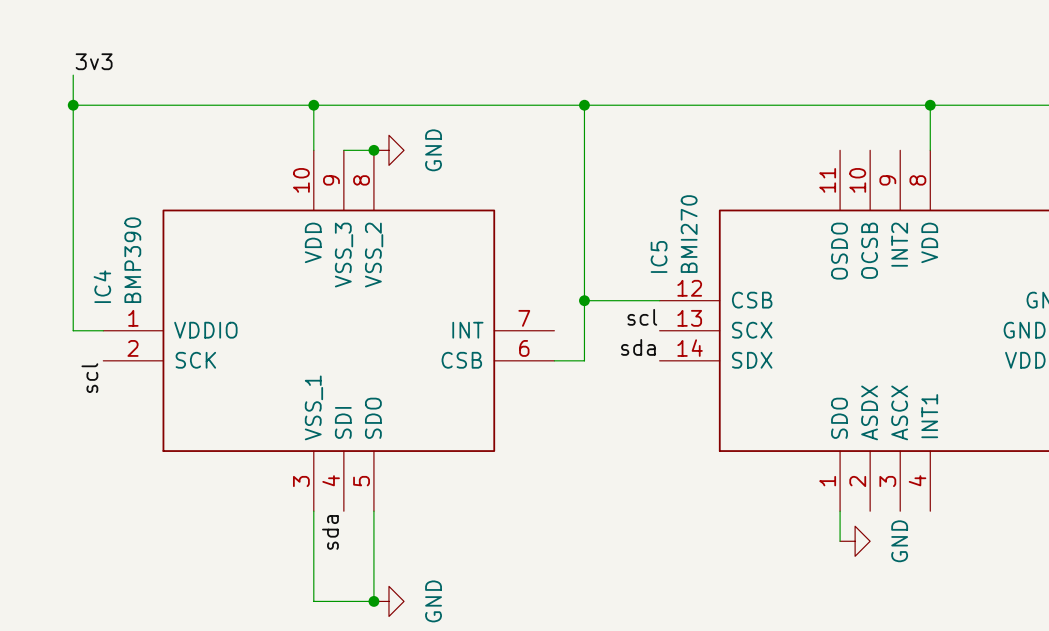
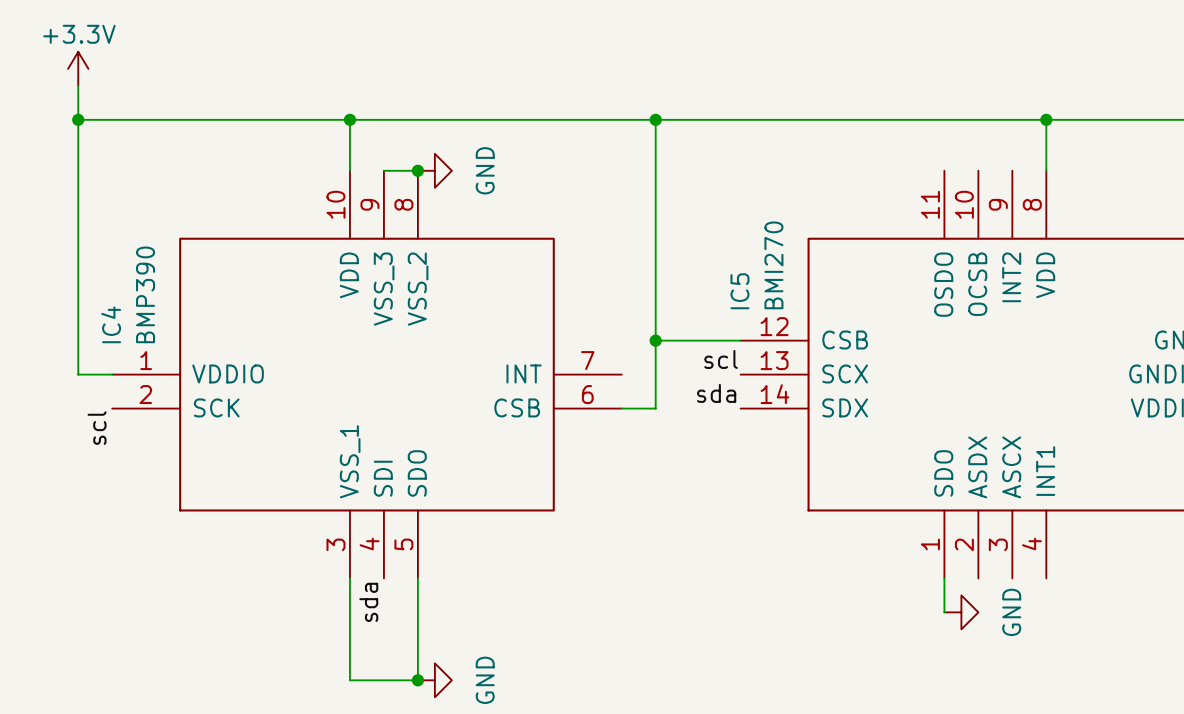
power symbol: none -> +3.3V (78, 68)
label: 3v3 (94, 61) -> none

